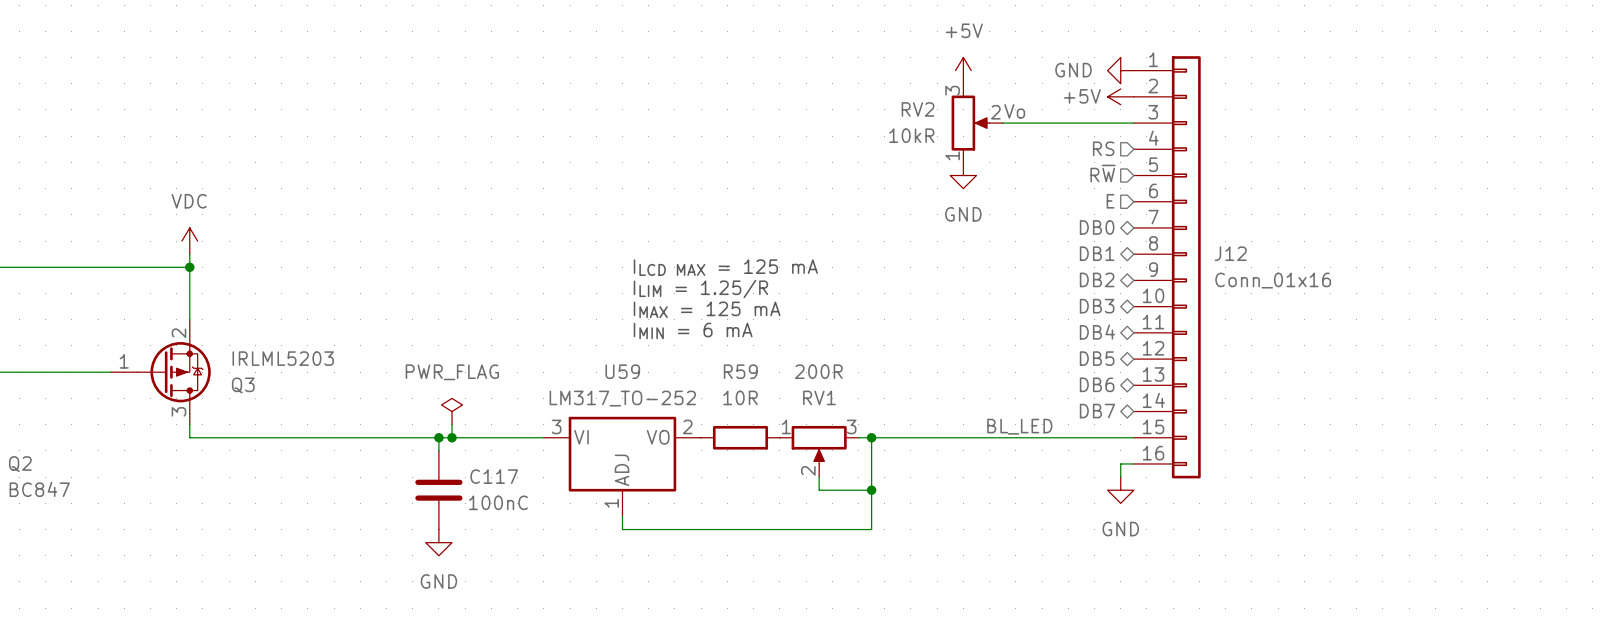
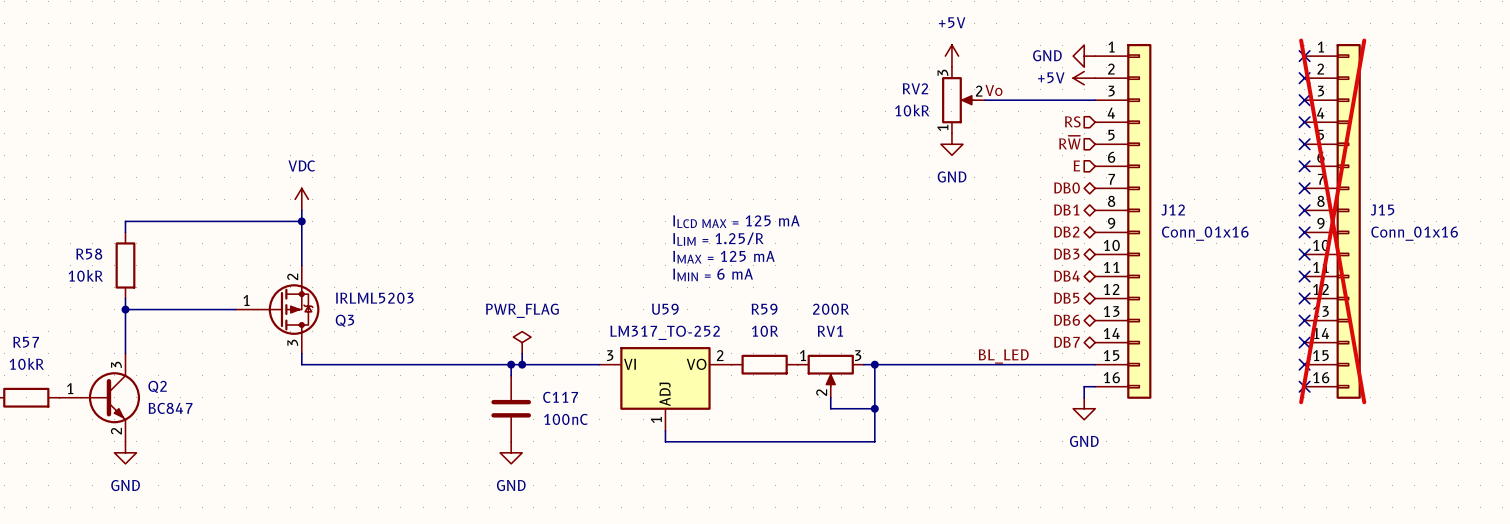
no-connect mark: none -> (1304, 56)
no-connect mark: none -> (1304, 78)
no-connect mark: none -> (1304, 100)
no-connect mark: none -> (1304, 122)
no-connect mark: none -> (1304, 144)
no-connect mark: none -> (1304, 166)
no-connect mark: none -> (1304, 188)
no-connect mark: none -> (1304, 210)
J15: none -> Conn_01x16 (1332, 221)
no-connect mark: none -> (1304, 232)
no-connect mark: none -> (1304, 254)
no-connect mark: none -> (1304, 276)
no-connect mark: none -> (1304, 298)
no-connect mark: none -> (1304, 320)
no-connect mark: none -> (1304, 342)
no-connect mark: none -> (1304, 364)
no-connect mark: none -> (1304, 386)

